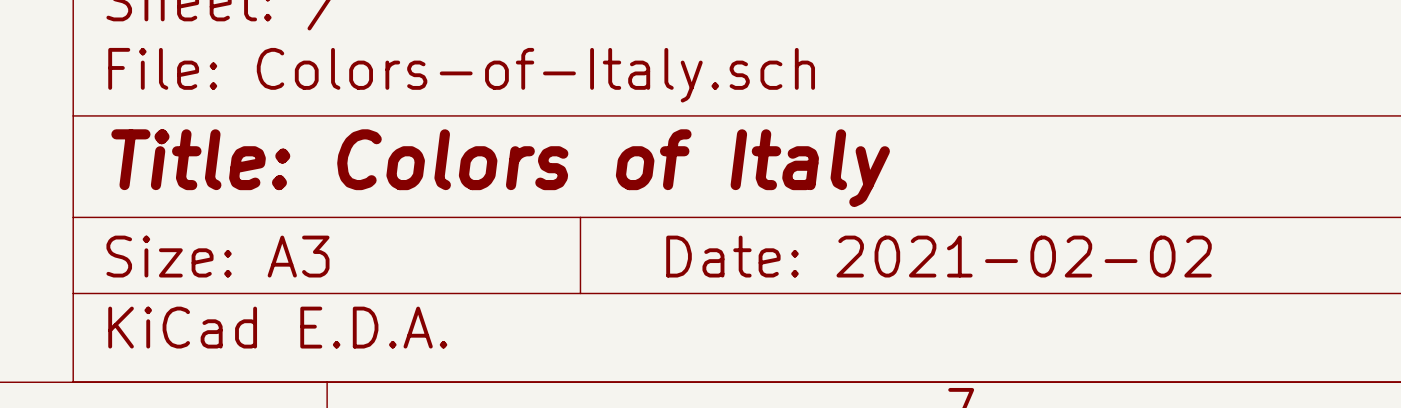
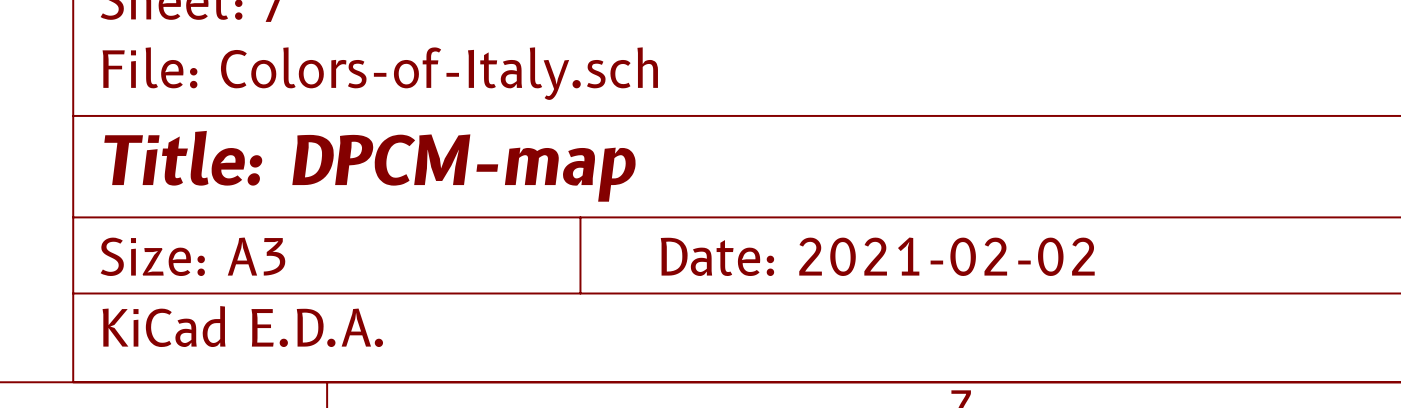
title block: Title: Colors of Italy (500, 168) -> Title: DPCM-map (370, 166)

